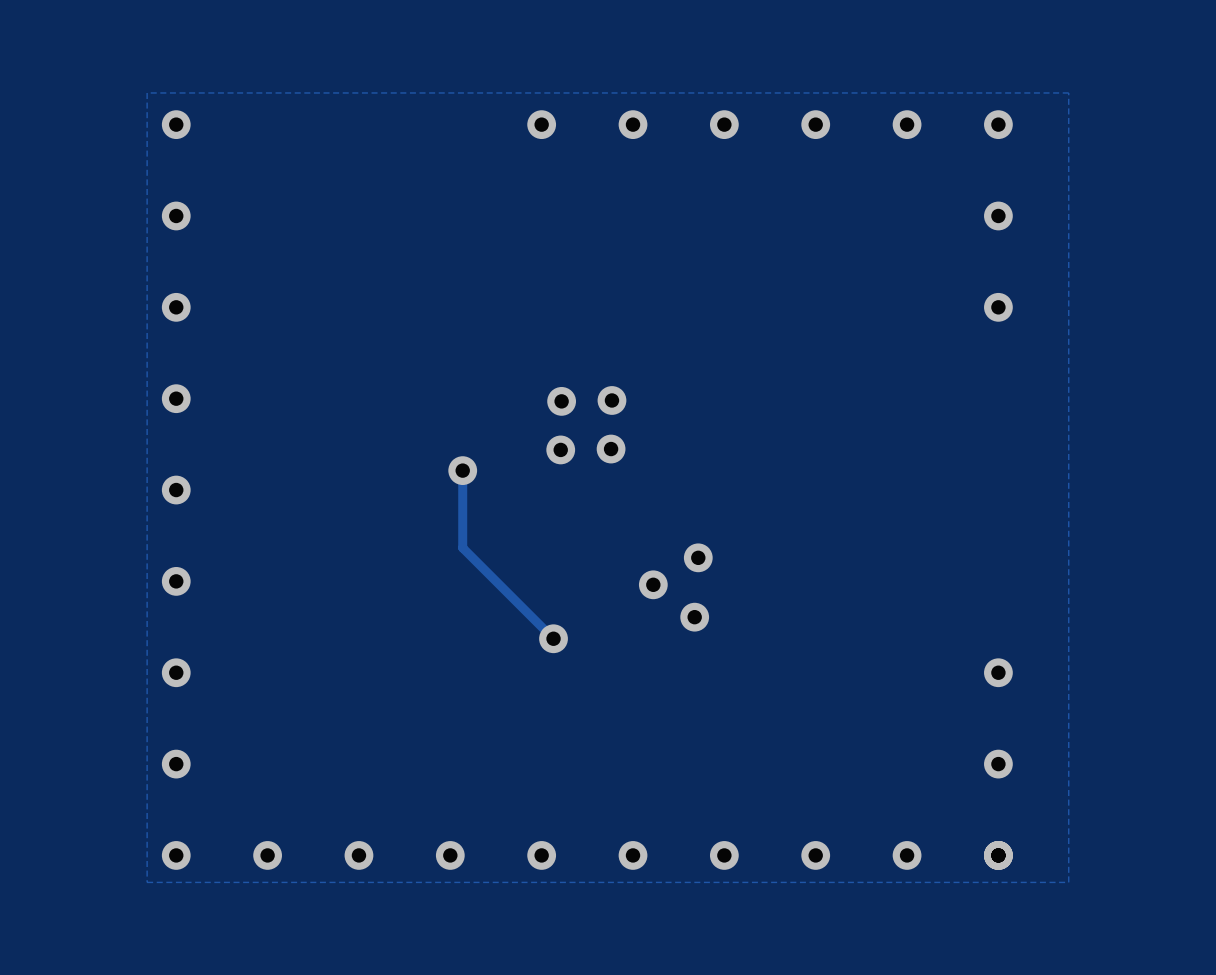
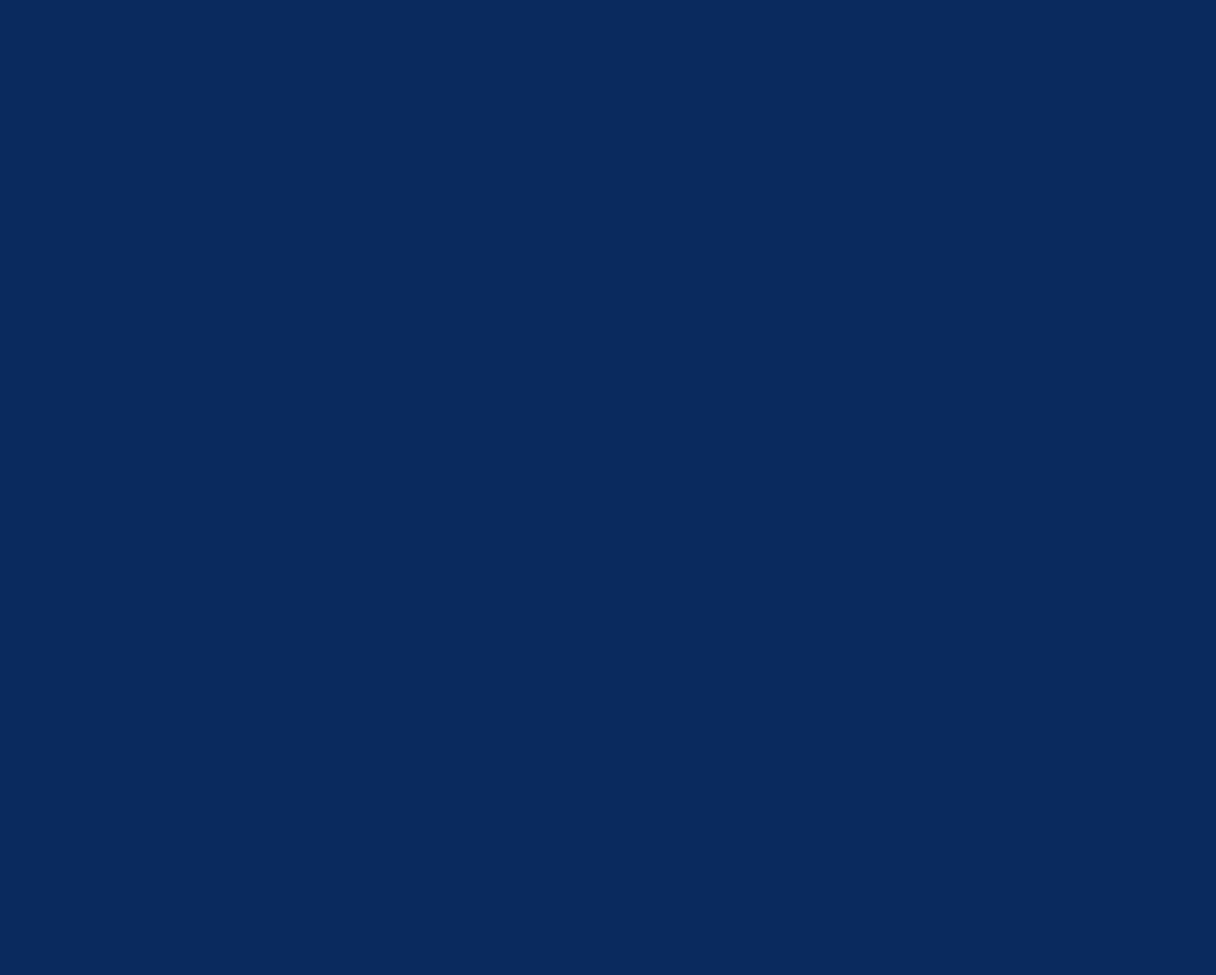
zone outline: (1068, 92) (147, 92) (147, 882) (1068, 882) (1068, 92) -> none
via: (176, 124) -> none
via: (541, 124) -> none
via: (633, 124) -> none
via: (724, 124) -> none
via: (815, 124) -> none
via: (907, 124) -> none
via: (998, 124) -> none
via: (176, 215) -> none
via: (998, 215) -> none
via: (176, 307) -> none
via: (998, 307) -> none
via: (176, 398) -> none
via: (611, 400) -> none
via: (561, 401) -> none
via: (560, 449) -> none
via: (611, 449) -> none
track: (462, 470) (462, 547) (553, 638) -> none
via: (462, 470) -> none
via: (176, 490) -> none
via: (698, 557) -> none
via: (176, 581) -> none
via: (653, 584) -> none
via: (694, 617) -> none
via: (553, 638) -> none
via: (176, 672) -> none
via: (998, 672) -> none
via: (176, 764) -> none
via: (998, 764) -> none
via: (176, 855) -> none
via: (267, 855) -> none
via: (358, 855) -> none
via: (450, 855) -> none
via: (541, 855) -> none
via: (633, 855) -> none
via: (724, 855) -> none
via: (815, 855) -> none
via: (907, 855) -> none
via: (998, 855) -> none

